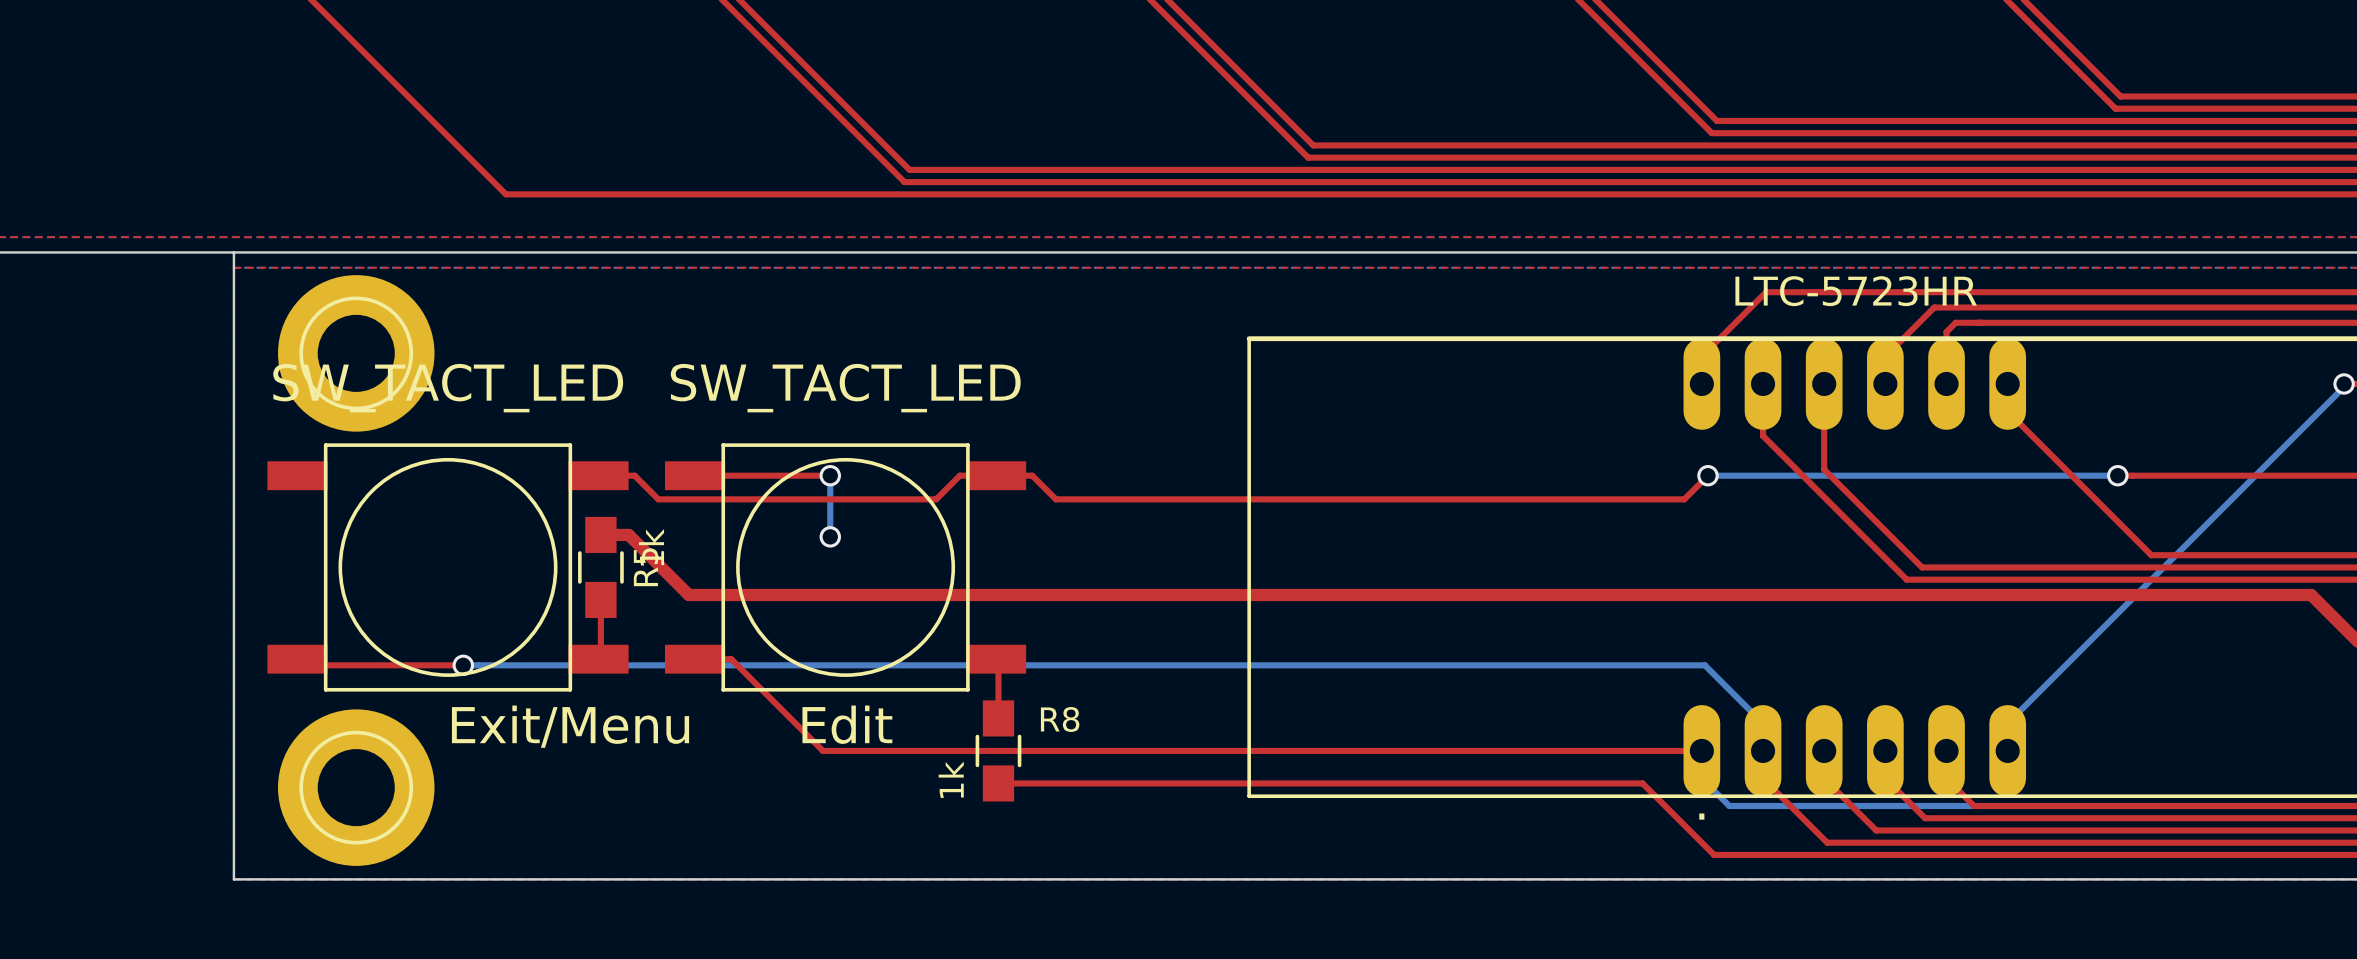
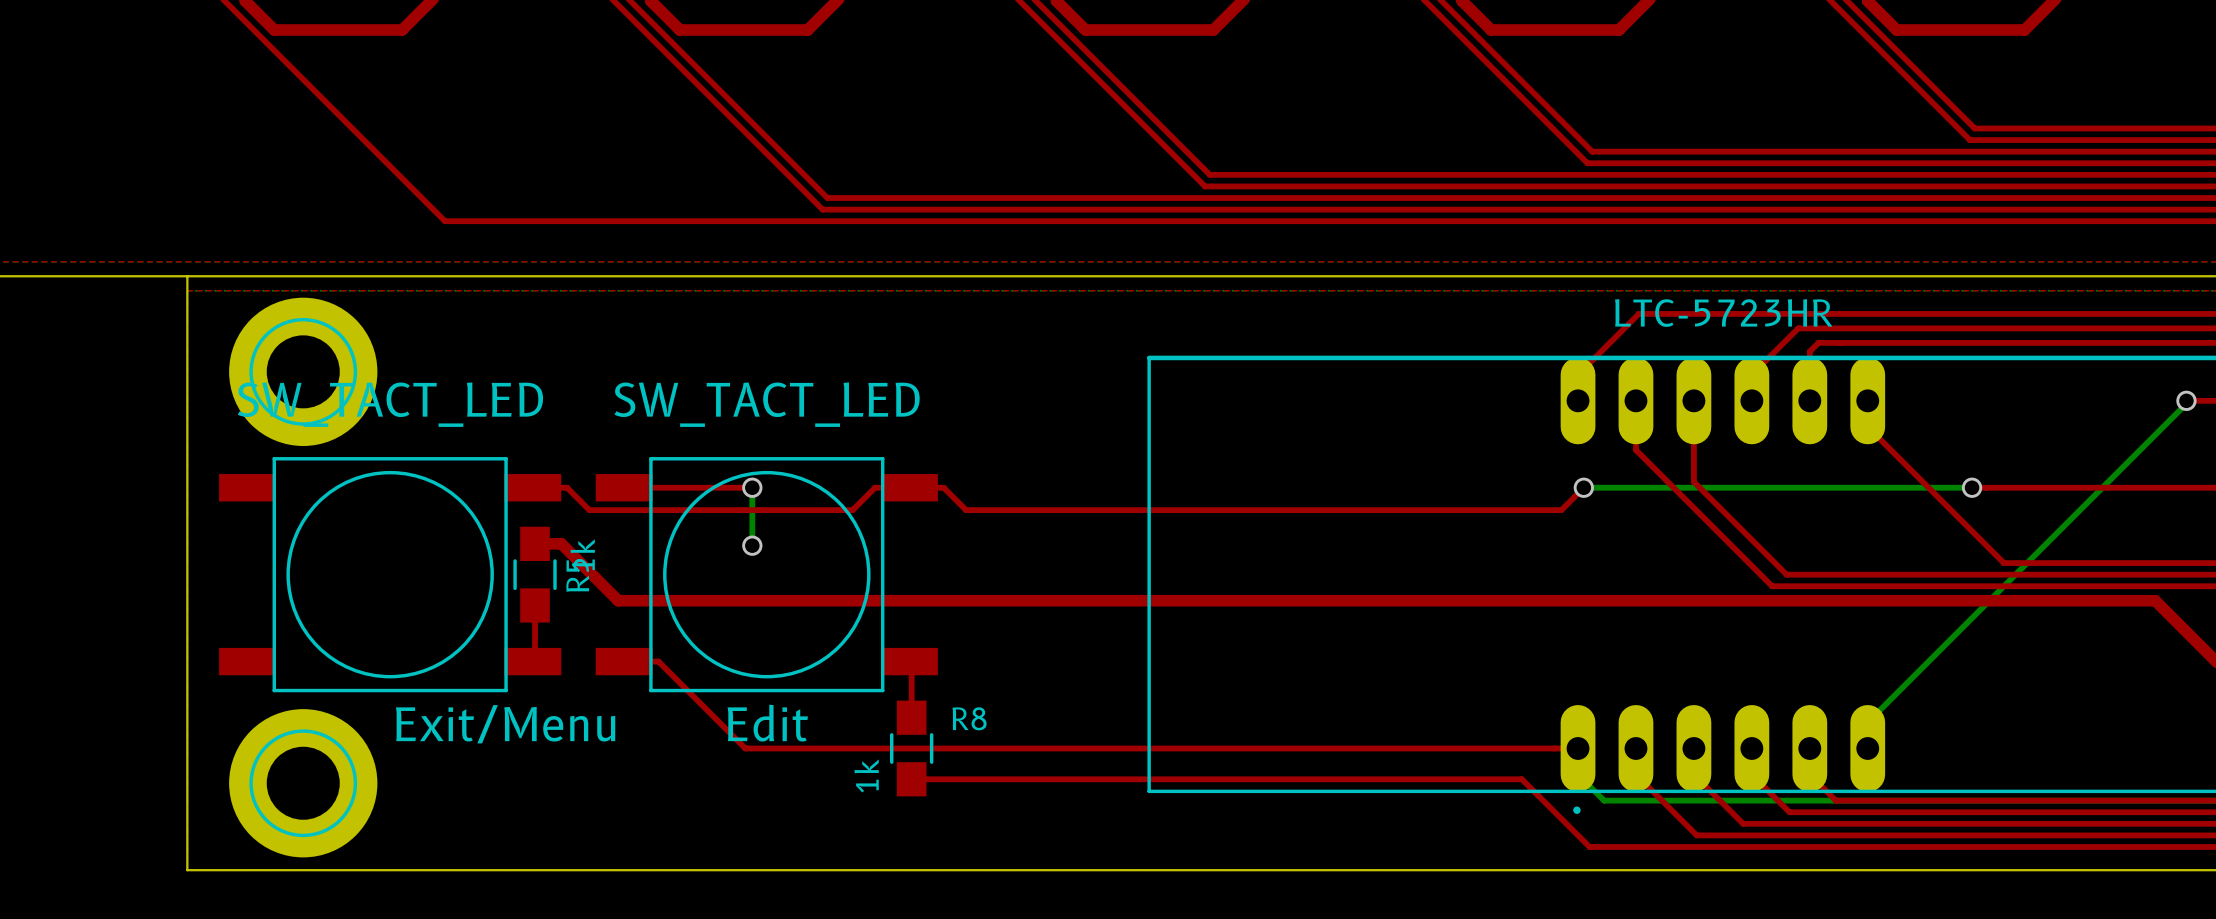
top track: (297, 659) (303, 665) (463, 665) -> none
bottom track: (463, 665) (1704, 665) (1763, 723) (1763, 750) -> none
via: (463, 665) -> none

